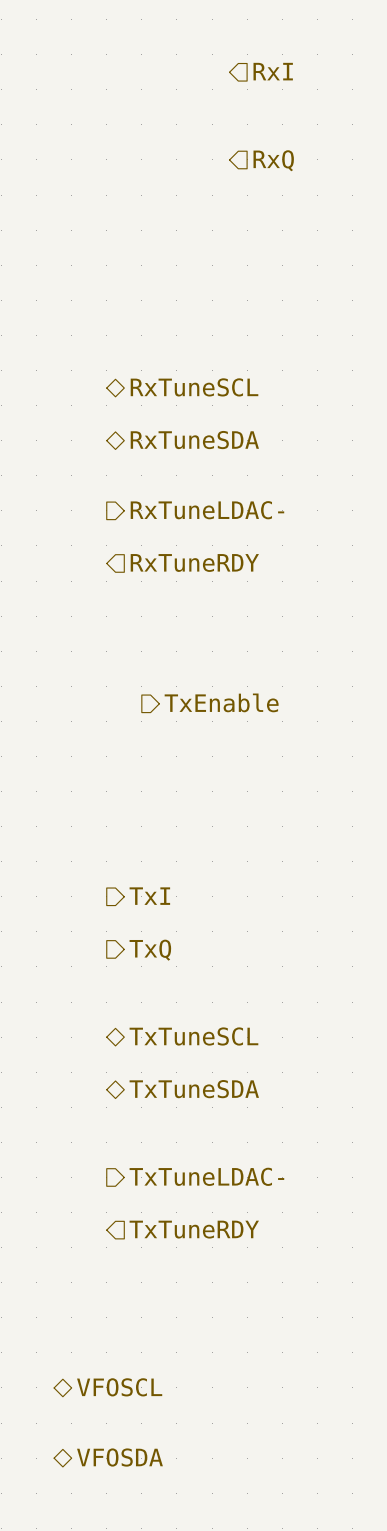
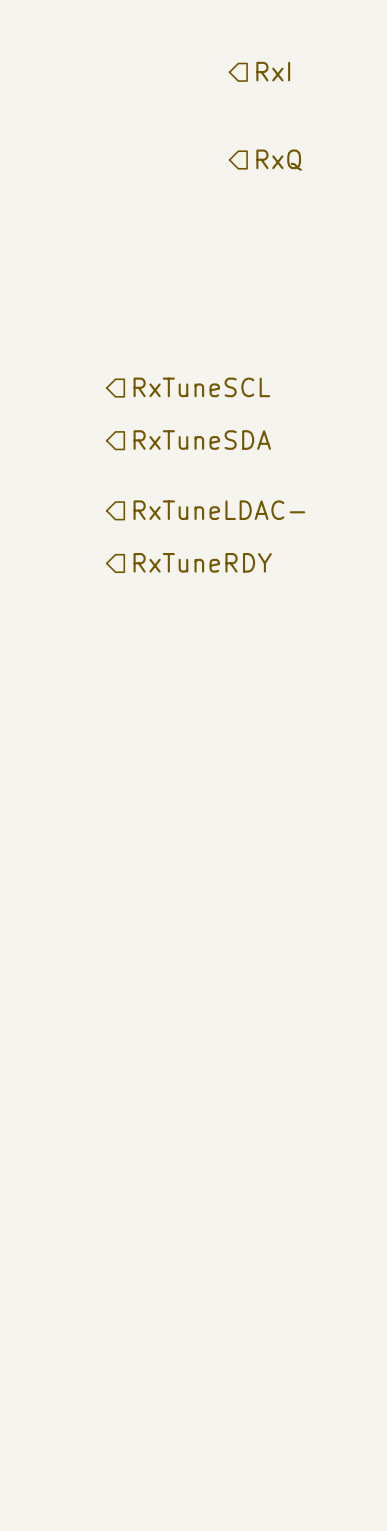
hierarchical label shape: bidirectional (194, 387) -> input (201, 387)
hierarchical label shape: bidirectional (194, 440) -> input (202, 440)
hierarchical label shape: output (207, 510) -> input (219, 510)
hierarchical label: TxEnable (221, 702) -> none
hierarchical label: TxI (149, 896) -> none
hierarchical label: TxQ (150, 950) -> none
hierarchical label: TxTuneSCL (193, 1036) -> none
hierarchical label: TxTuneSDA (194, 1089) -> none
hierarchical label: TxTuneLDAC- (206, 1176) -> none
hierarchical label: TxTuneRDY (194, 1229) -> none
hierarchical label: VFOSCL (119, 1387) -> none
hierarchical label: VFOSDA (119, 1457) -> none

